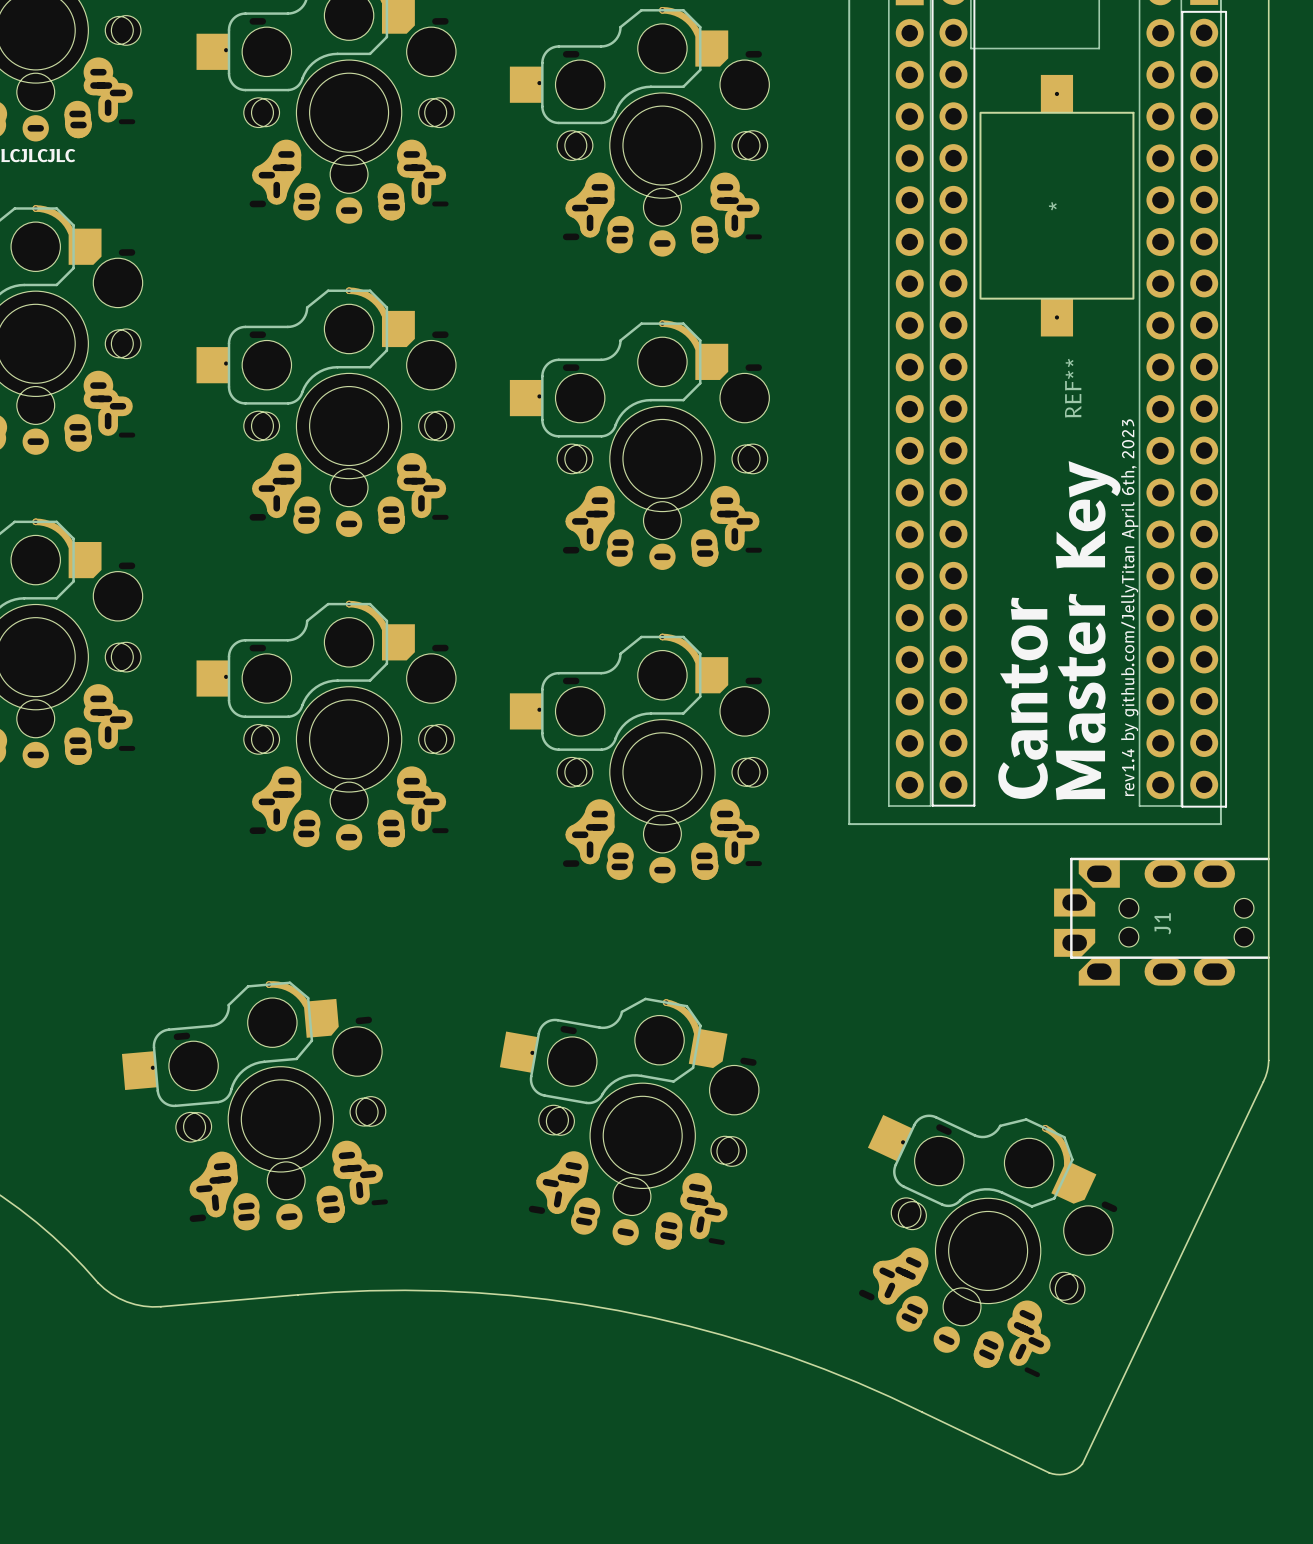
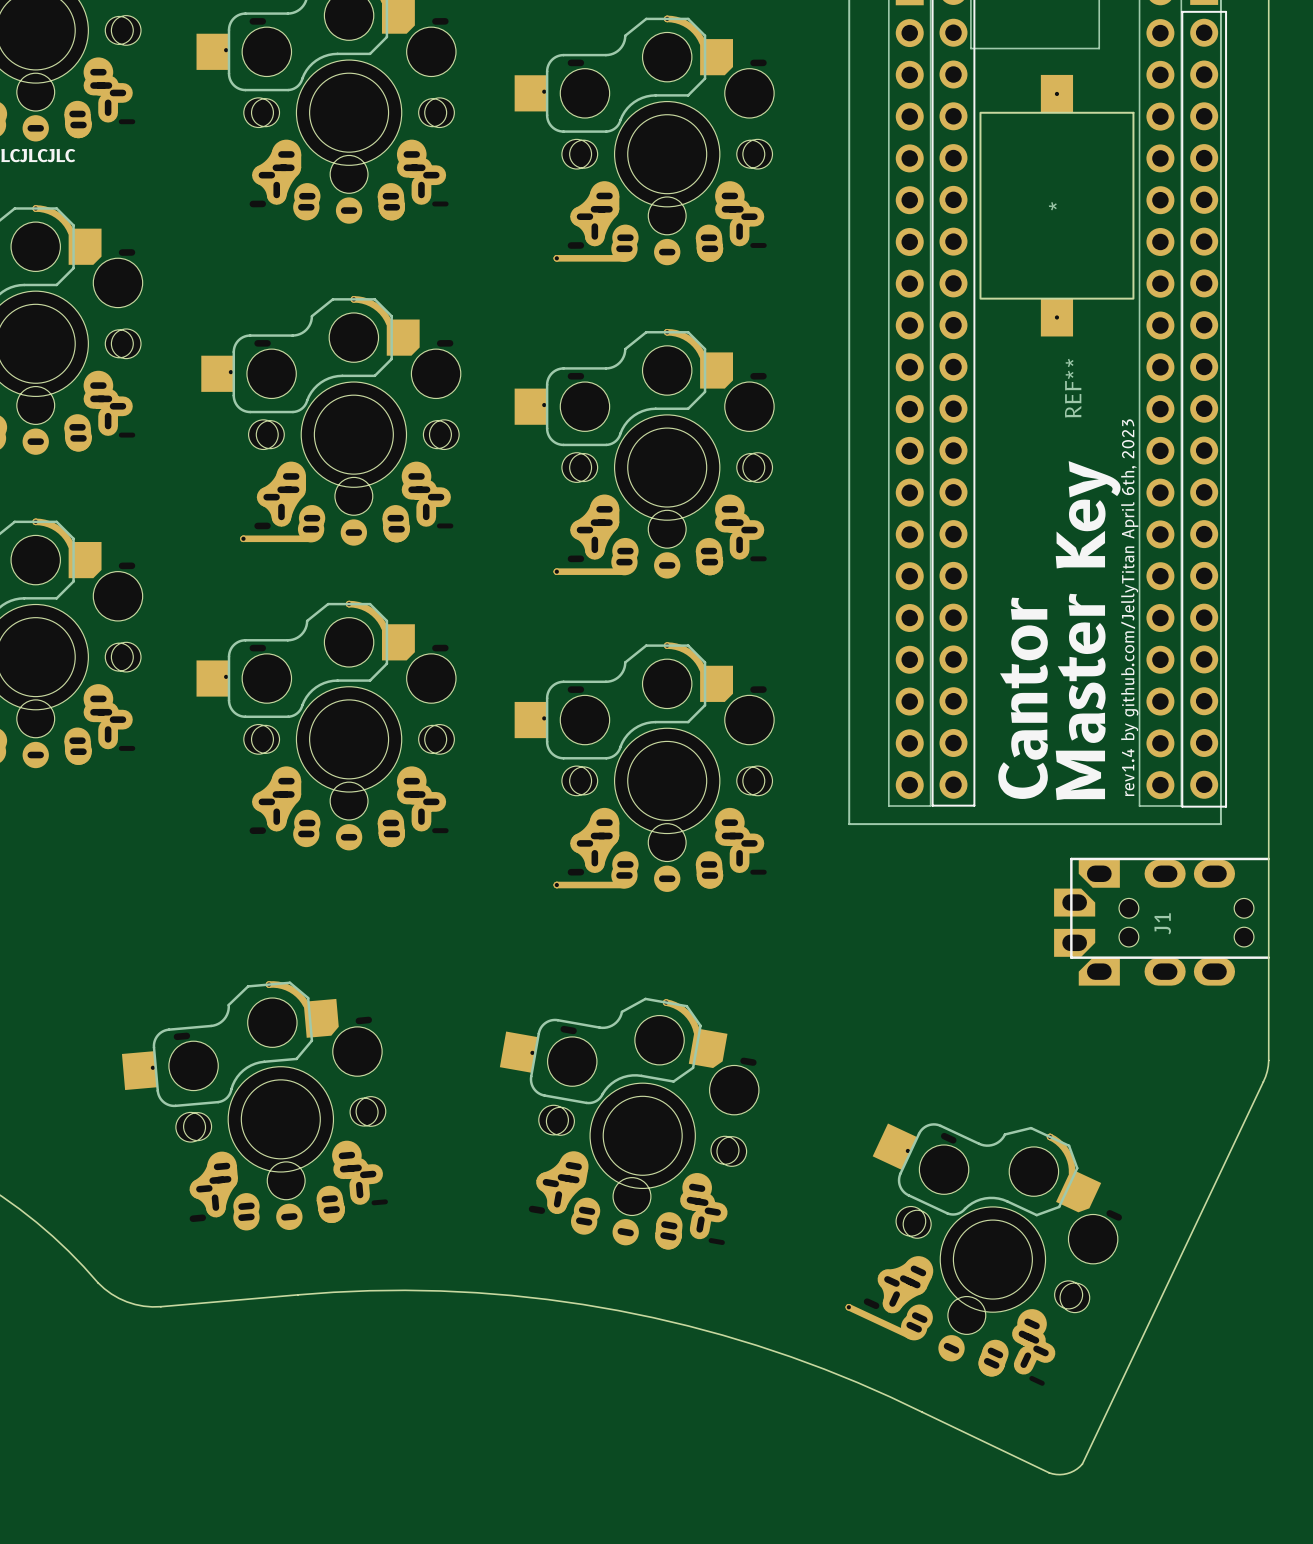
part footprint: [509, 7, 770, 257] -> [514, 15, 775, 266]
part footprint: [196, 287, 457, 538] -> [201, 296, 461, 546]
part footprint: [509, 320, 770, 570] -> [514, 328, 775, 579]
part footprint: [509, 633, 770, 884] -> [514, 642, 775, 892]
part footprint: [859, 1114, 1118, 1378] -> [845, 1123, 1122, 1386]

